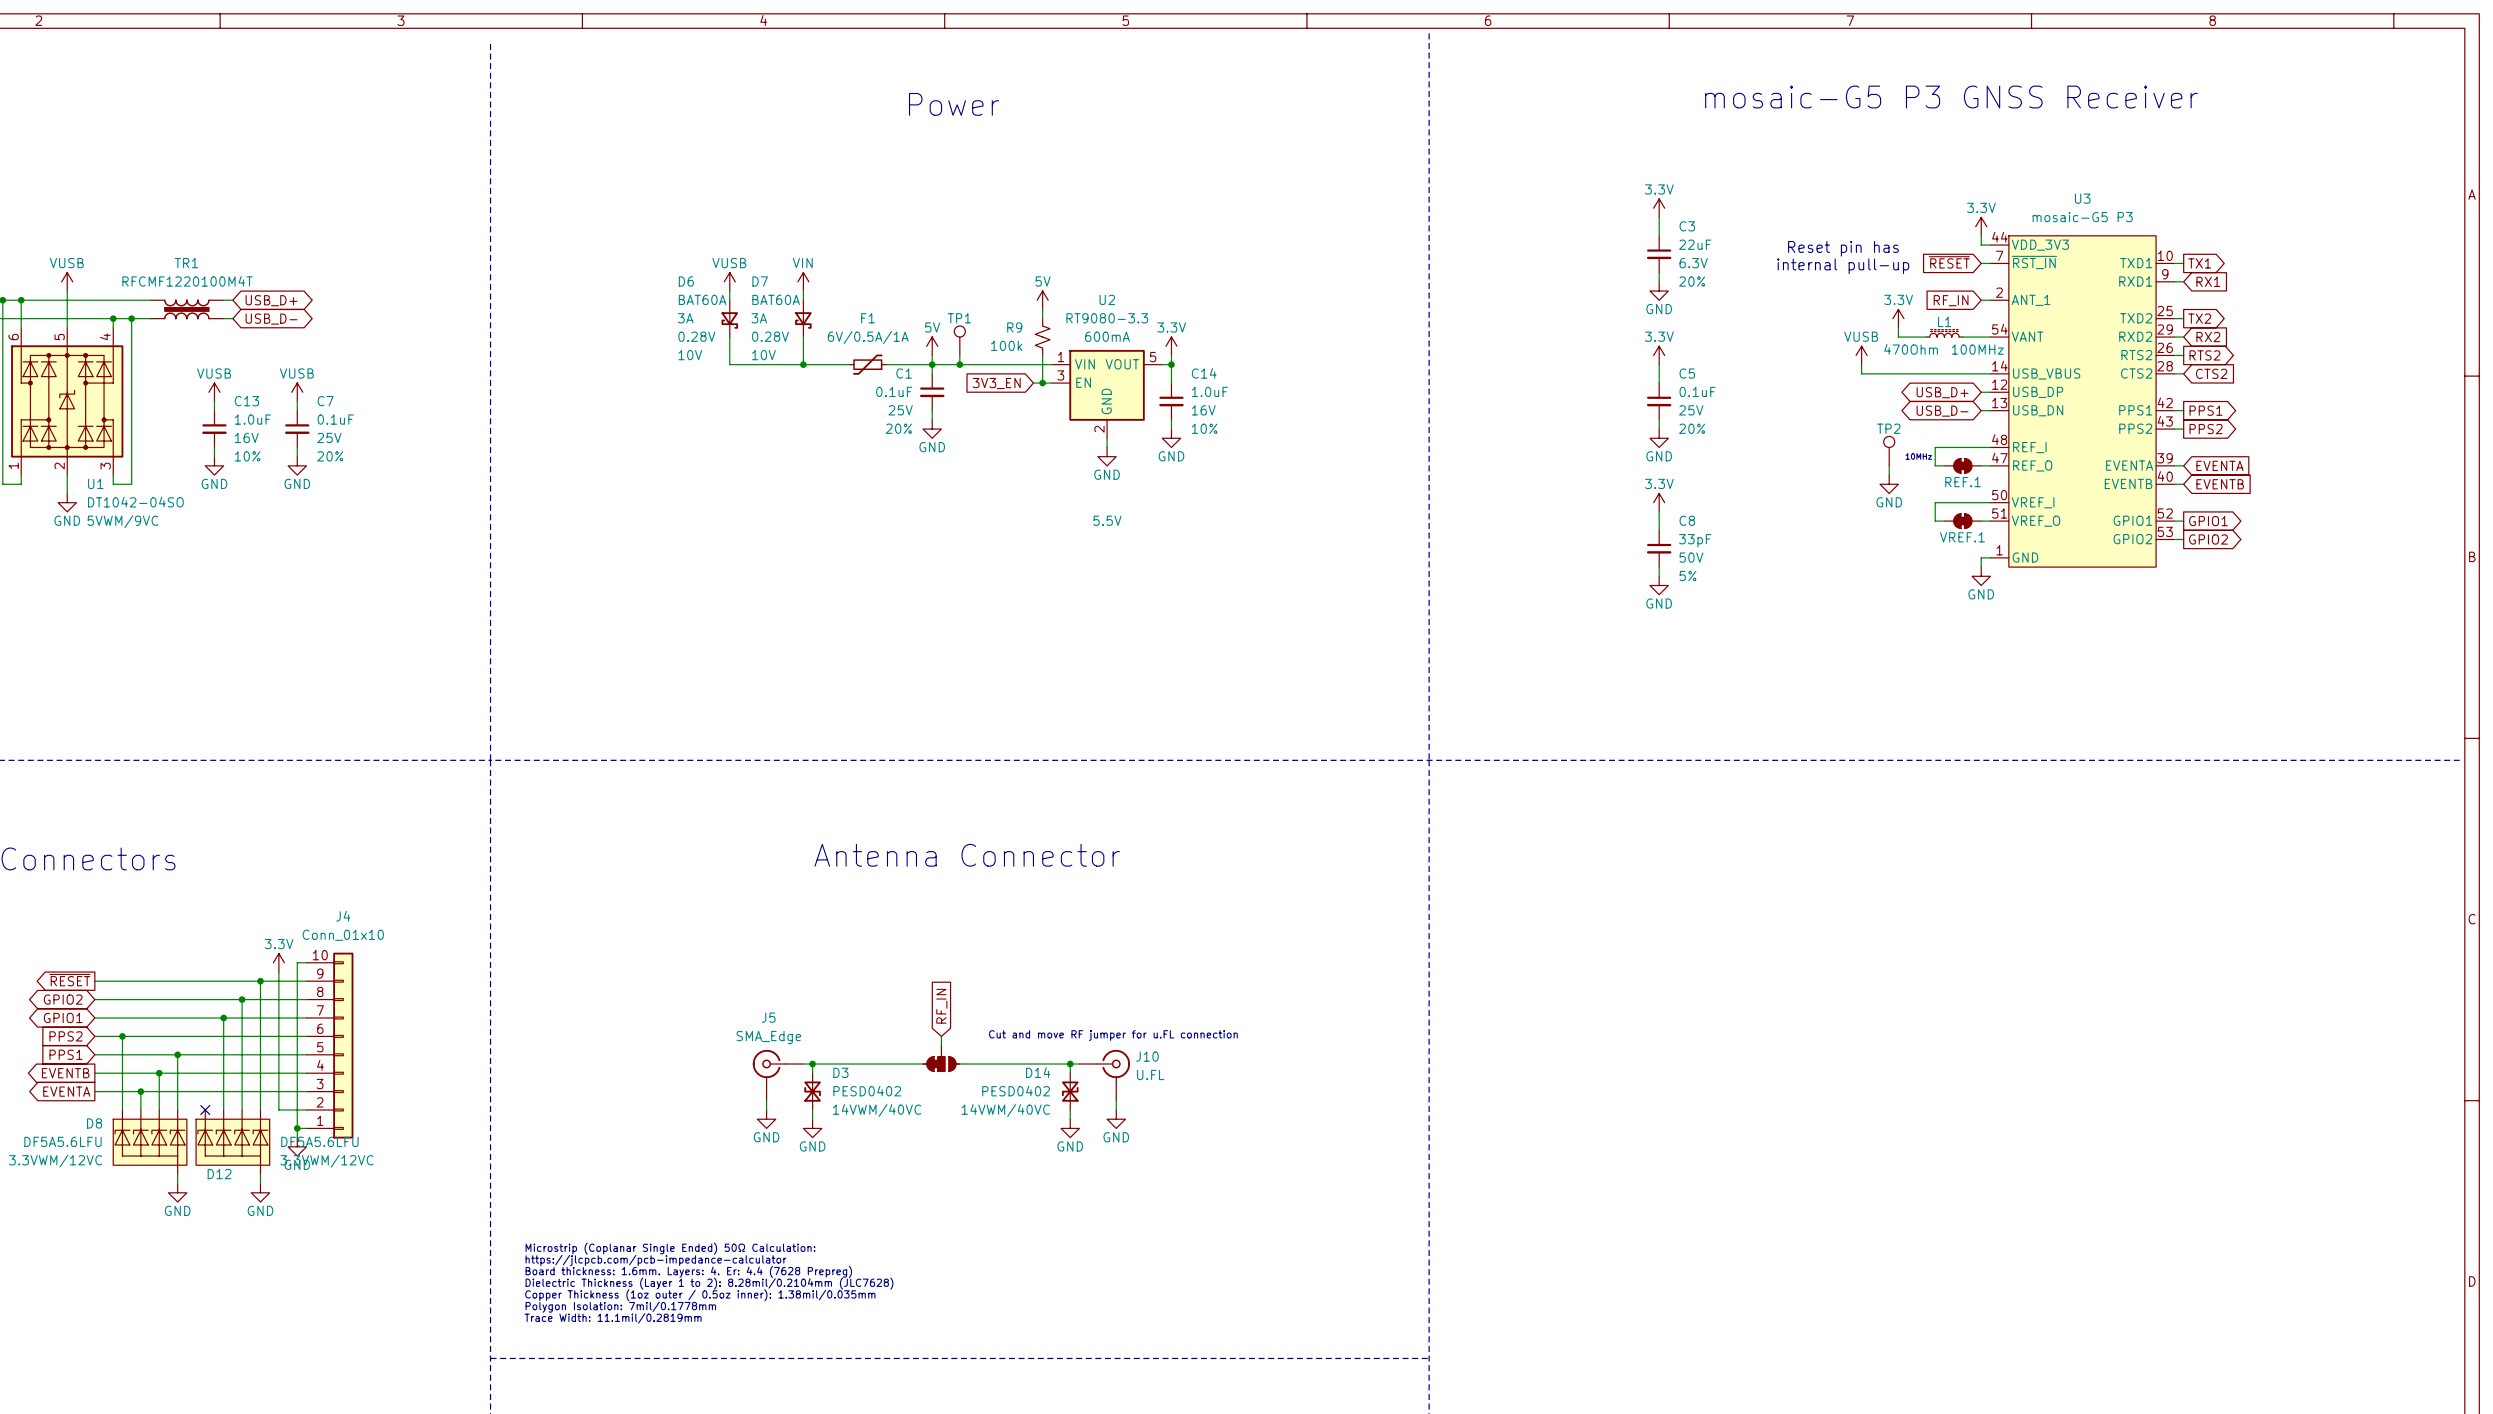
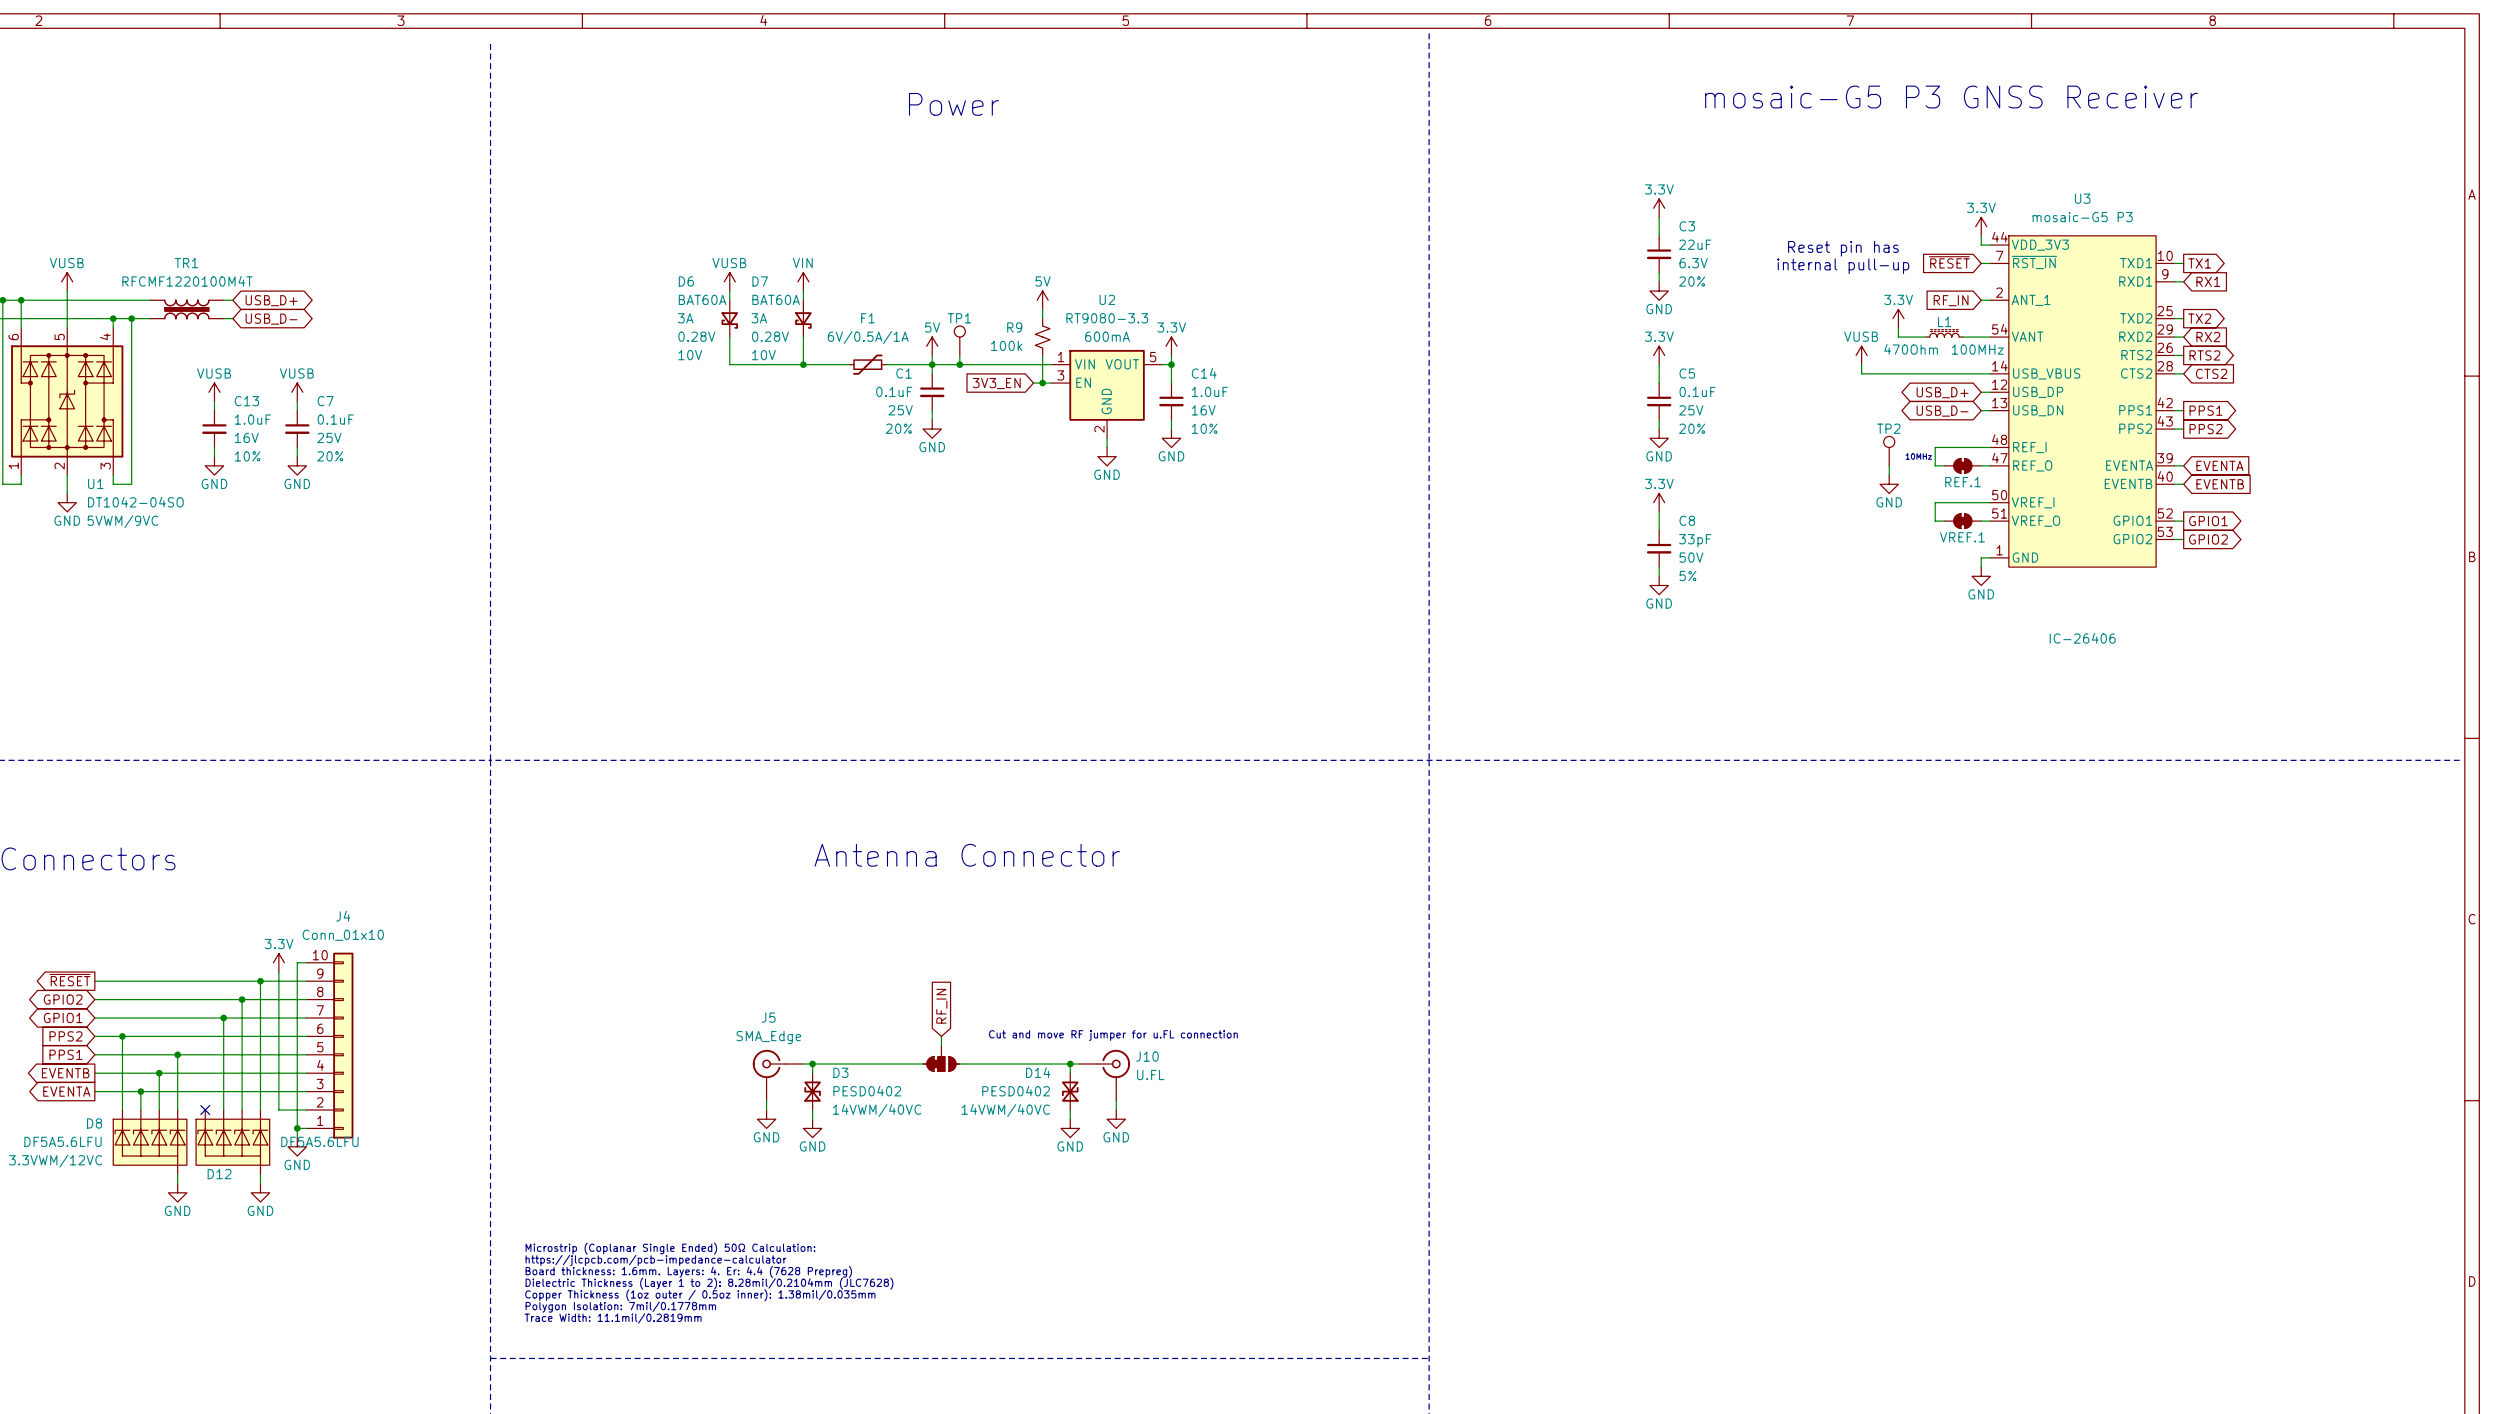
U2 text: 5.5V (1107, 520) -> none
U3 text: none -> IC-26406 (2082, 638)
D12 text: 3.3VWM/12VC (326, 1161) -> none

